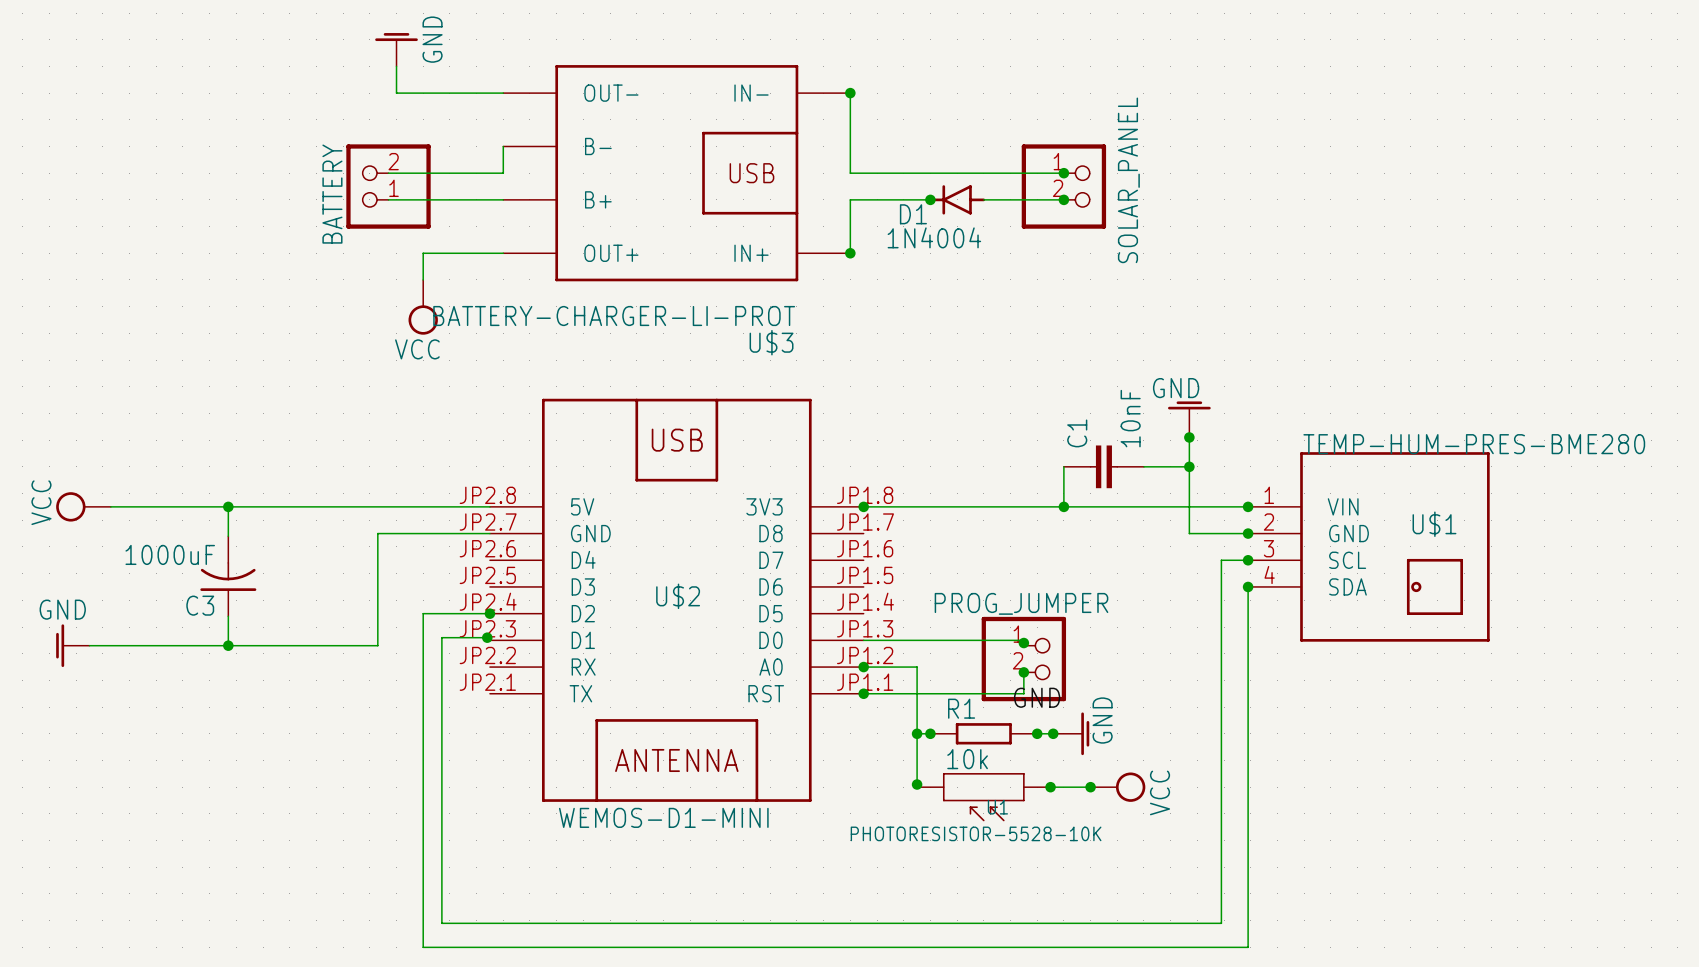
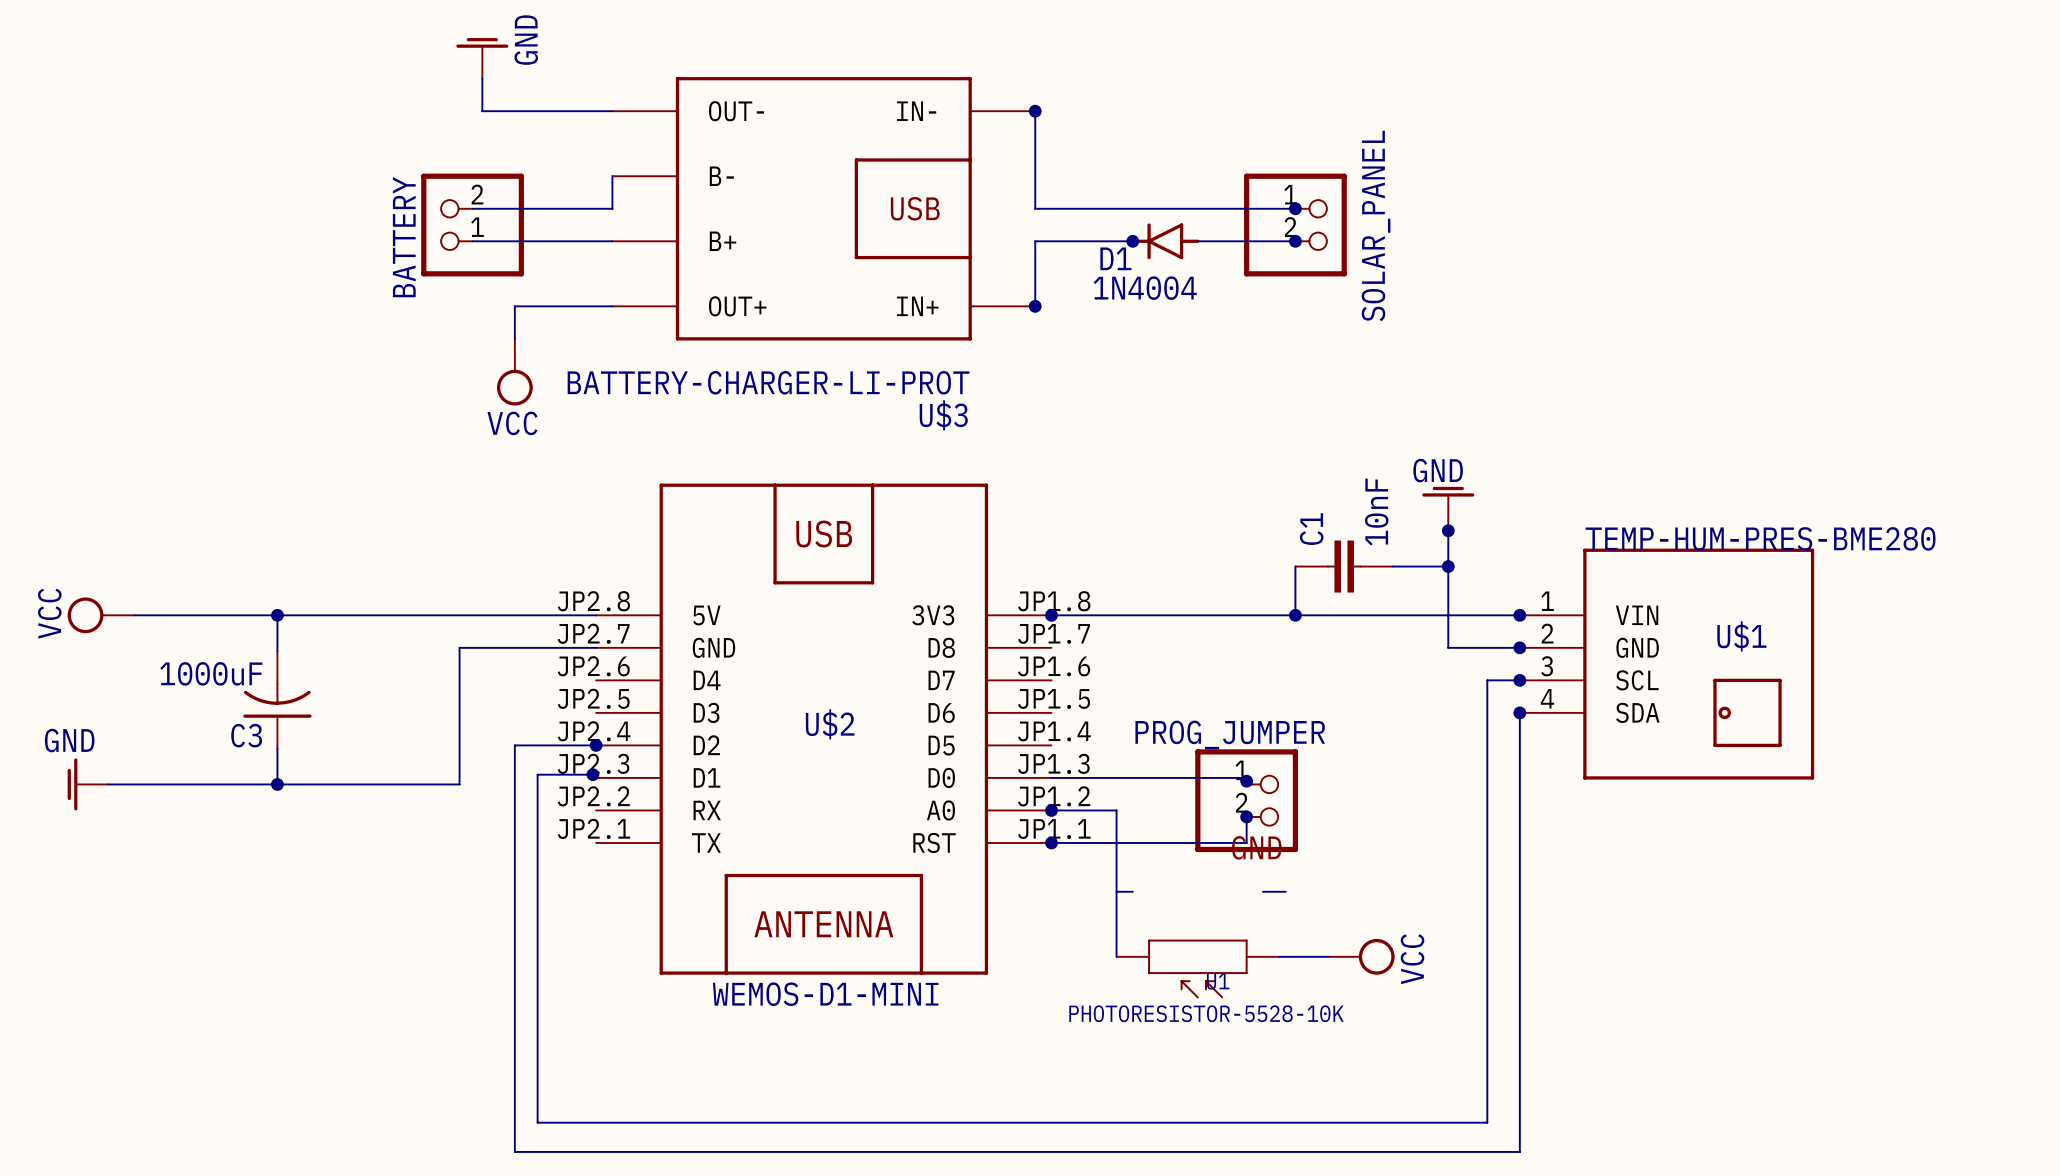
junction: (917, 733) -> none
junction: (930, 733) -> none
R1: 10k (983, 733) -> none
junction: (1037, 733) -> none
junction: (1053, 733) -> none
power symbol: GND (1072, 733) -> none
junction: (917, 784) -> none
junction: (1050, 787) -> none
junction: (1090, 787) -> none

